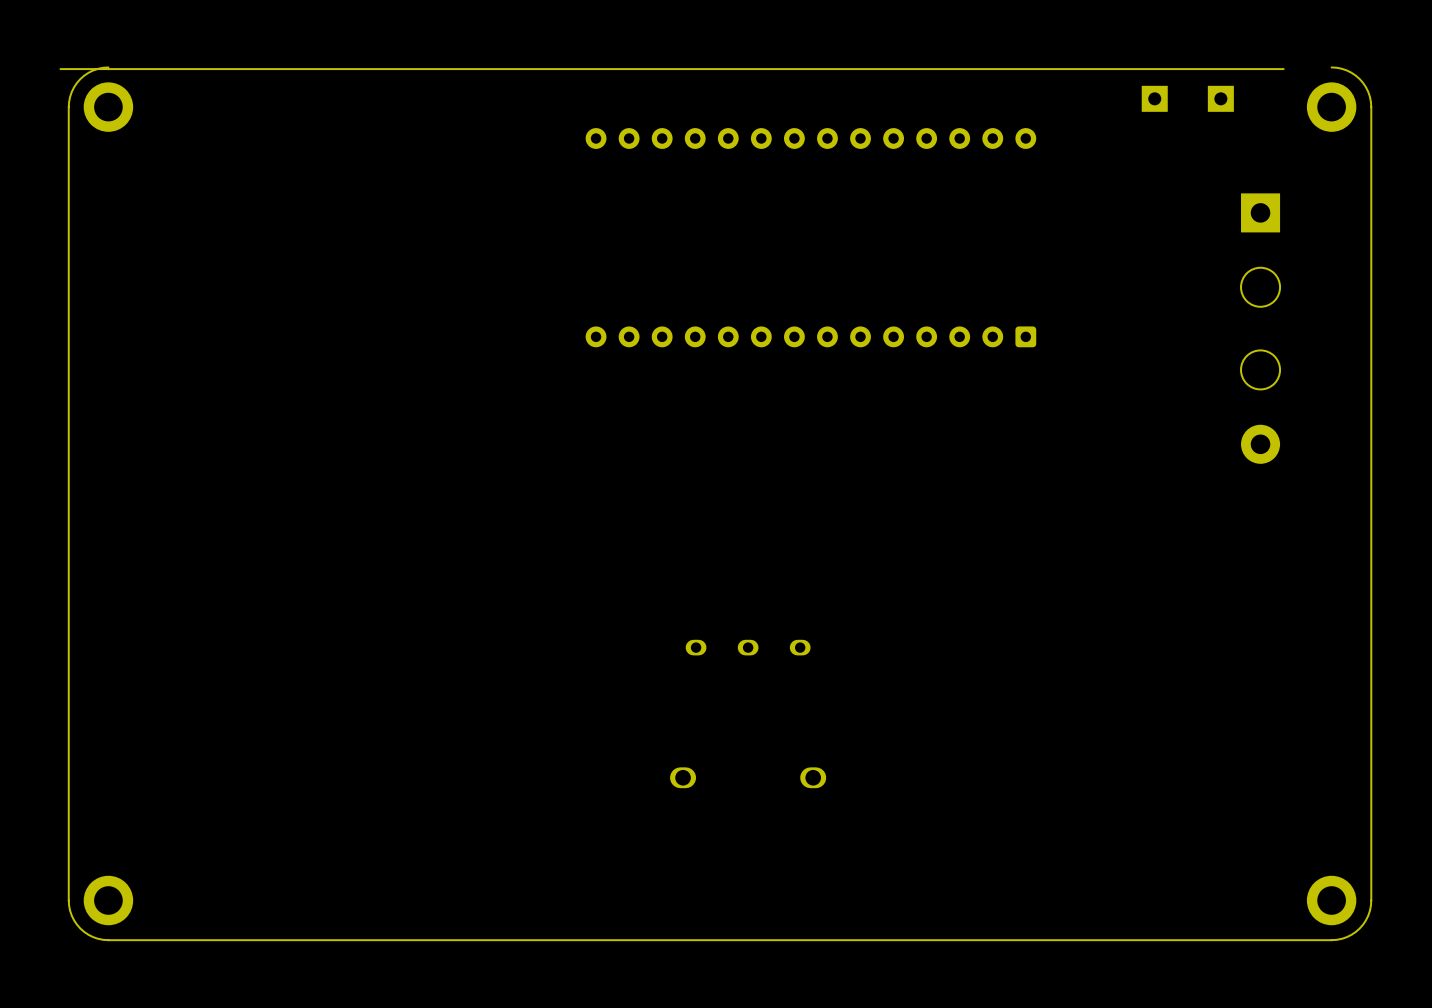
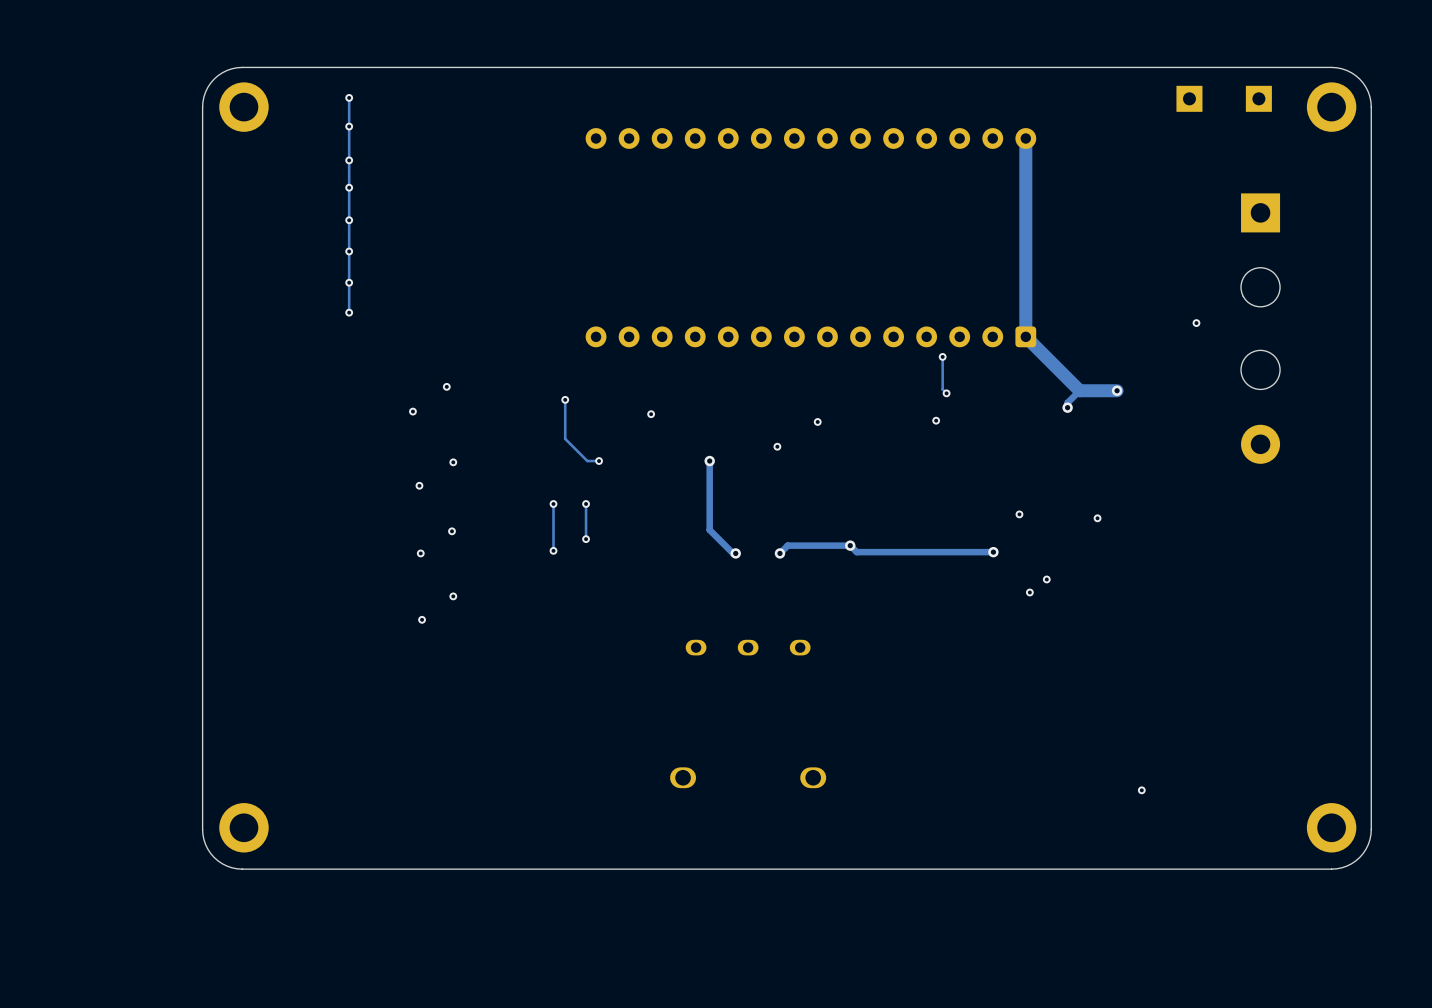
board edge: (108, 67) (93, 70) (80, 79) (71, 91) (68, 107) (68, 900) (74, 920) (88, 934) (108, 940) (1336, 939) (1351, 934) (1359, 928) (1369, 910) (1371, 829) -> (1331, 67) (242, 67) (227, 70) (218, 75) (207, 87) (202, 107) (202, 829) (205, 844) (214, 857) (227, 866) (242, 869) (1331, 869) (1346, 866) (1359, 857) (1368, 844) (1371, 829)
board edge: (1283, 69) (60, 69) -> none
track: none -> (349, 97) (349, 312)
via: none -> (349, 97)
part: (1154, 98) -> none
part: none -> (1189, 98)
part: (1220, 98) -> none
part: none -> (1258, 98)
part position: (108, 107) -> (243, 107)
via: none -> (349, 126)
track: none -> (1025, 138) (1025, 336) (1079, 390)
via: none -> (349, 160)
via: none -> (349, 187)
via: none -> (349, 220)
via: none -> (349, 251)
via: none -> (349, 282)
via: none -> (349, 312)
via: none -> (1196, 323)
track: none -> (942, 356) (942, 389) (946, 393)
via: none -> (942, 356)
via: none -> (446, 386)
track: none -> (1079, 390) (1067, 402) (1067, 407)
track: none -> (1117, 390) (1079, 390)
via: none -> (1117, 390)
via: none -> (946, 393)
track: none -> (565, 399) (565, 438) (587, 461) (599, 461)
via: none -> (565, 399)
via: none -> (1067, 407)
via: none -> (412, 411)
via: none -> (651, 414)
via: none -> (936, 420)
via: none -> (817, 421)
via: none -> (777, 446)
via: none -> (599, 461)
track: none -> (709, 461) (709, 530) (733, 553) (735, 553)
via: none -> (709, 461)
via: none -> (453, 462)
via: none -> (419, 485)
track: none -> (553, 503) (553, 552)
via: none -> (553, 503)
track: none -> (586, 503) (586, 539)
via: none -> (586, 503)
via: none -> (1019, 514)
via: none -> (1097, 518)
via: none -> (451, 531)
via: none -> (586, 539)
via: none -> (850, 545)
via: none -> (553, 550)
track: none -> (993, 552) (856, 552) (850, 545) (787, 545) (779, 553)
via: none -> (993, 552)
via: none -> (420, 553)
via: none -> (735, 553)
via: none -> (779, 553)
via: none -> (1046, 579)
via: none -> (1029, 592)
via: none -> (453, 596)
via: none -> (422, 619)
via: none -> (1141, 790)
part position: (108, 900) -> (243, 827)
part position: (1331, 900) -> (1331, 827)

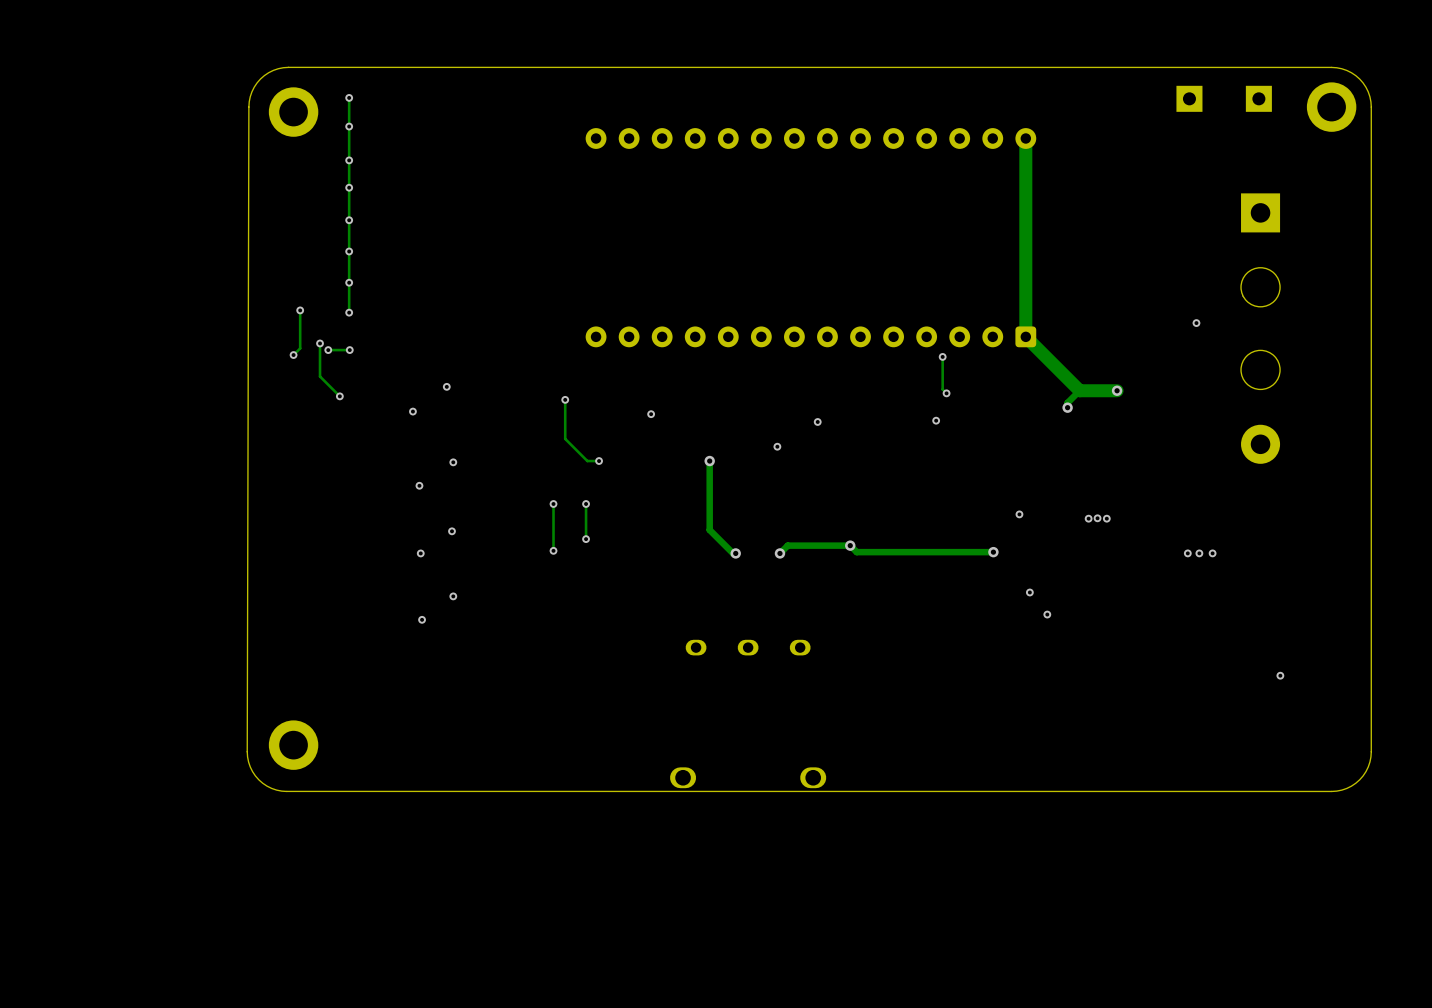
board edge: (288, 67) (242, 67) (227, 70) (210, 82) (202, 101) (202, 829) (207, 849) (222, 863) (242, 869) (1336, 868) (1351, 863) (1359, 857) (1369, 839) (1371, 751) -> (286, 791) (1331, 791) (1346, 788) (1359, 779) (1368, 766) (1371, 751)
board edge: none -> (288, 67) (273, 70) (260, 79) (251, 91) (248, 107) (247, 751) (250, 766) (258, 779) (271, 788) (286, 791)
part position: (243, 107) -> (293, 112)
track: none -> (300, 310) (300, 348) (293, 355)
via: none -> (300, 310)
track: none -> (320, 343) (320, 376) (339, 396)
via: none -> (320, 343)
via: none -> (328, 350)
track: none -> (349, 350) (328, 350)
via: none -> (349, 350)
via: none -> (293, 355)
via: none -> (339, 396)
via: none -> (1088, 518)
via: none -> (1106, 518)
via: none -> (1187, 553)
via: none -> (1199, 553)
via: none -> (1212, 553)
via position: (1046, 579) -> (1047, 614)
via: none -> (1280, 675)
via: (1141, 790) -> none
part position: (243, 827) -> (293, 745)
part: (1331, 827) -> none

